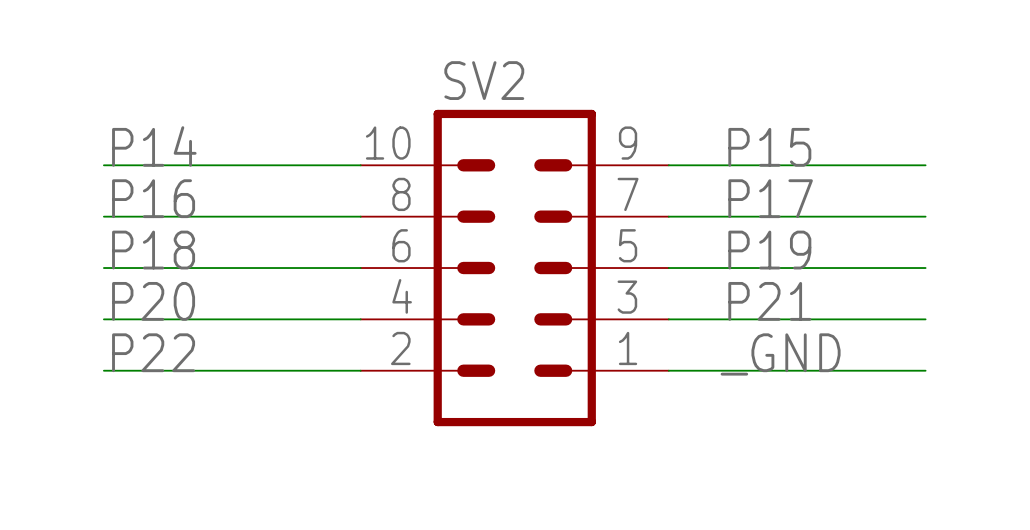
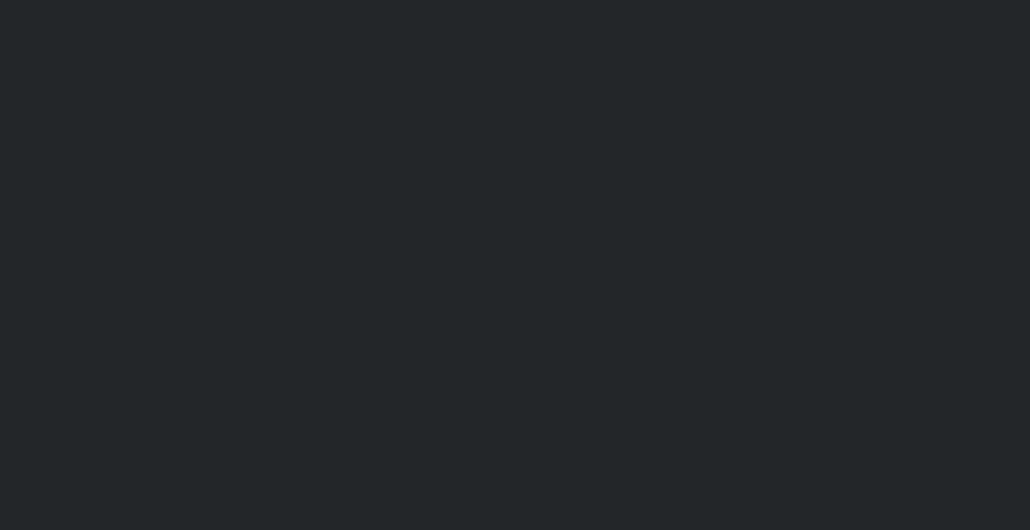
label: P14 (154, 146) -> none
label: P15 (769, 147) -> none
wire: (103, 165) (360, 165) -> none
wire: (668, 165) (925, 165) -> none
label: P16 (153, 198) -> none
label: P17 (770, 198) -> none
wire: (103, 216) (360, 216) -> none
wire: (668, 216) (925, 216) -> none
label: P18 (153, 250) -> none
label: P19 (769, 250) -> none
wire: (103, 268) (360, 268) -> none
SV2: (514, 268) -> none
wire: (668, 268) (925, 268) -> none
label: P20 (153, 301) -> none
label: P21 (769, 301) -> none
wire: (103, 319) (360, 319) -> none
wire: (668, 319) (925, 319) -> none
label: P22 (153, 352) -> none
label: _GND (780, 354) -> none
wire: (103, 370) (360, 370) -> none
wire: (668, 370) (925, 370) -> none

